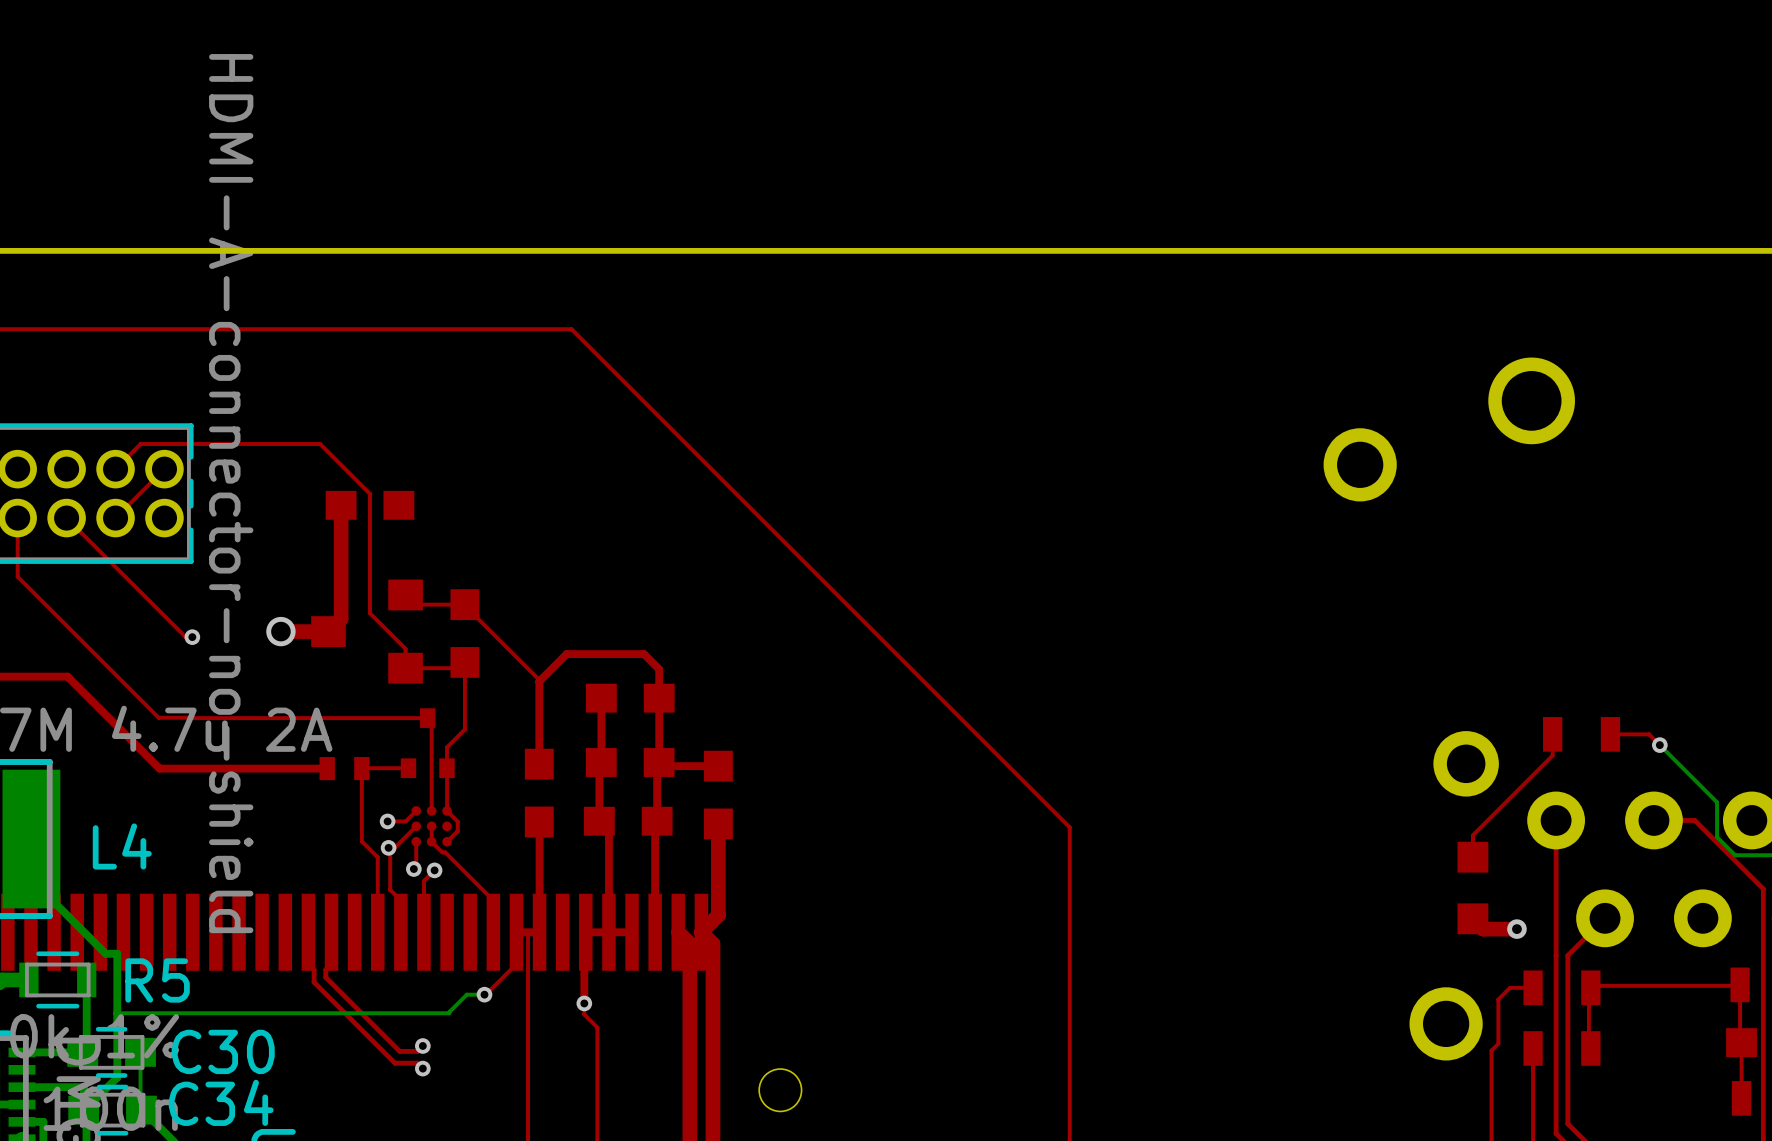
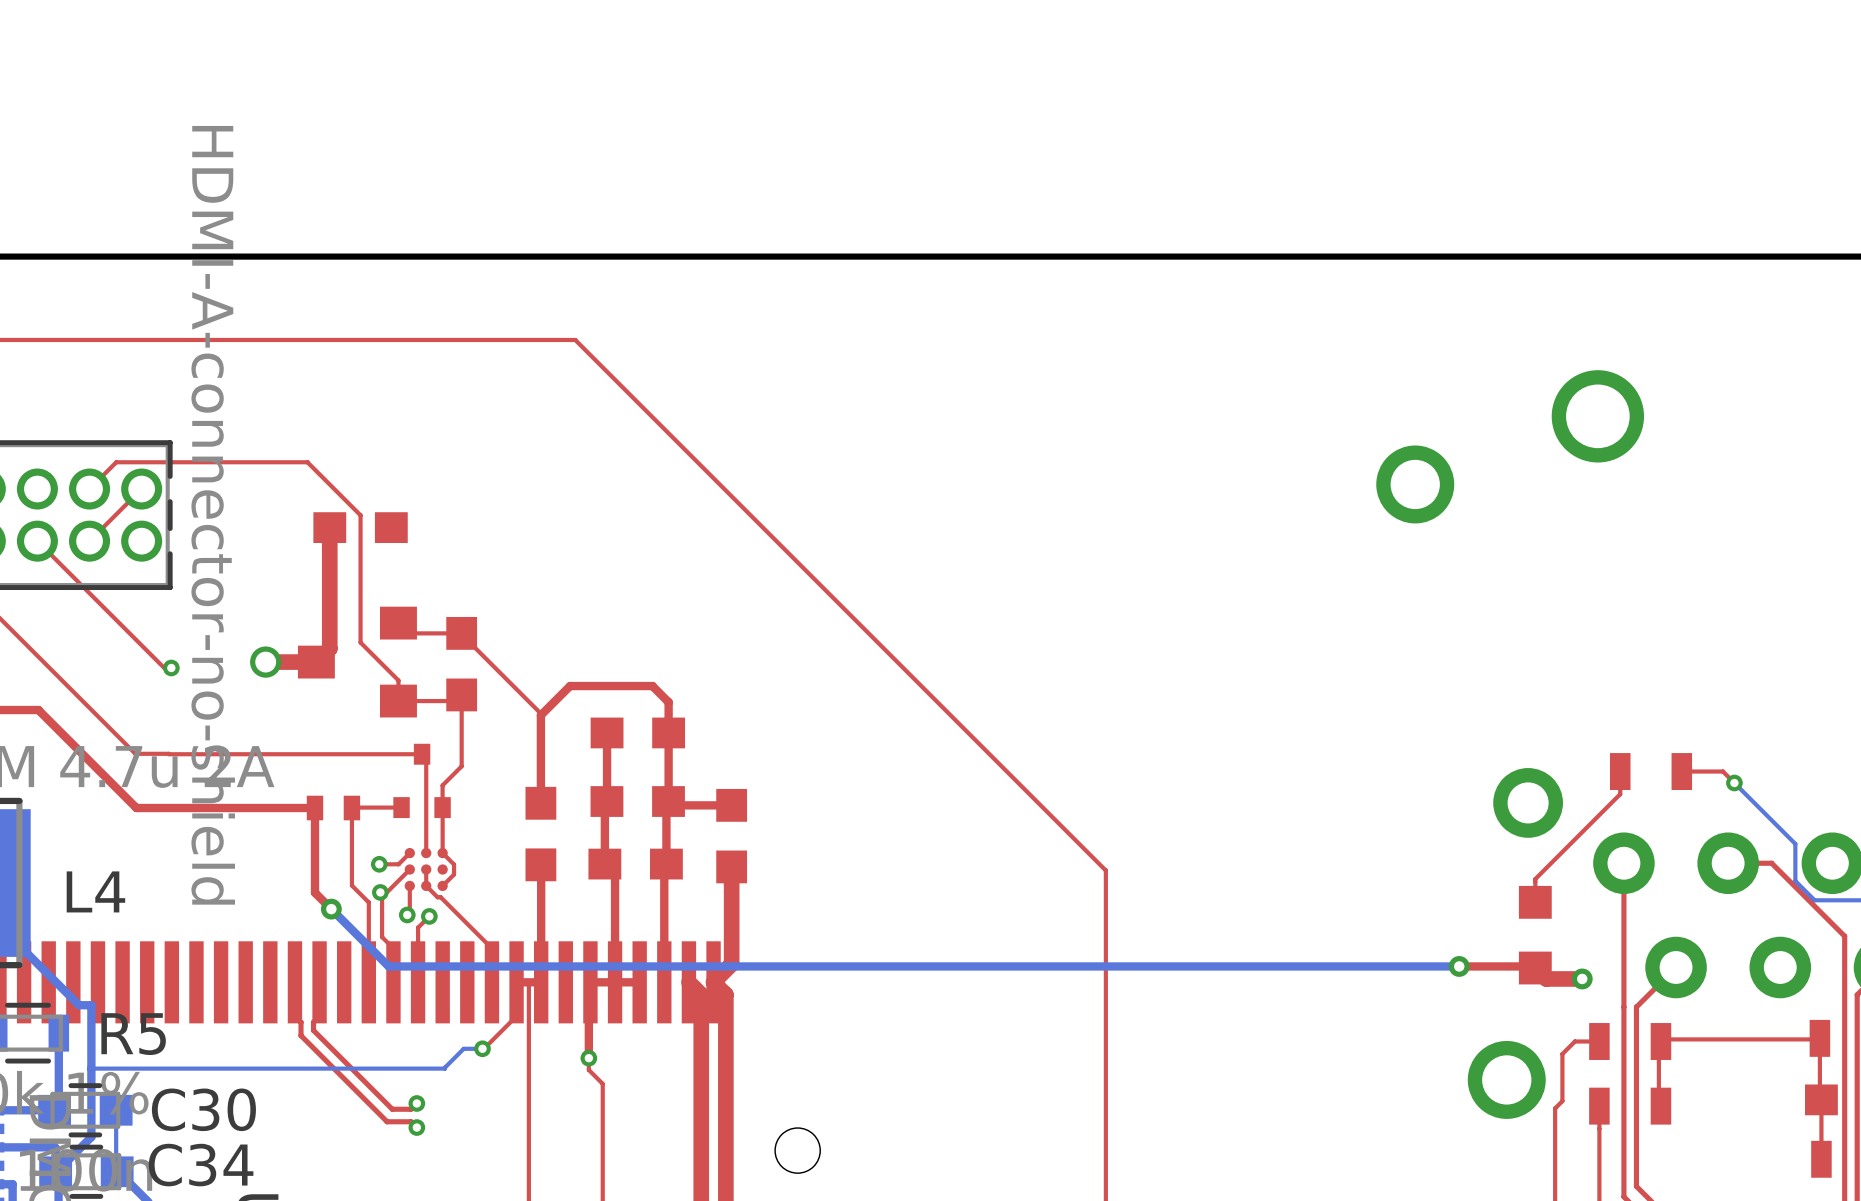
top track: none -> (314, 808) (314, 892) (331, 909)
bottom track: none -> (331, 909) (388, 966) (1459, 966)
via: none -> (331, 909)
top track: none -> (1459, 966) (1533, 966) (1535, 968)
via: none -> (1459, 966)

